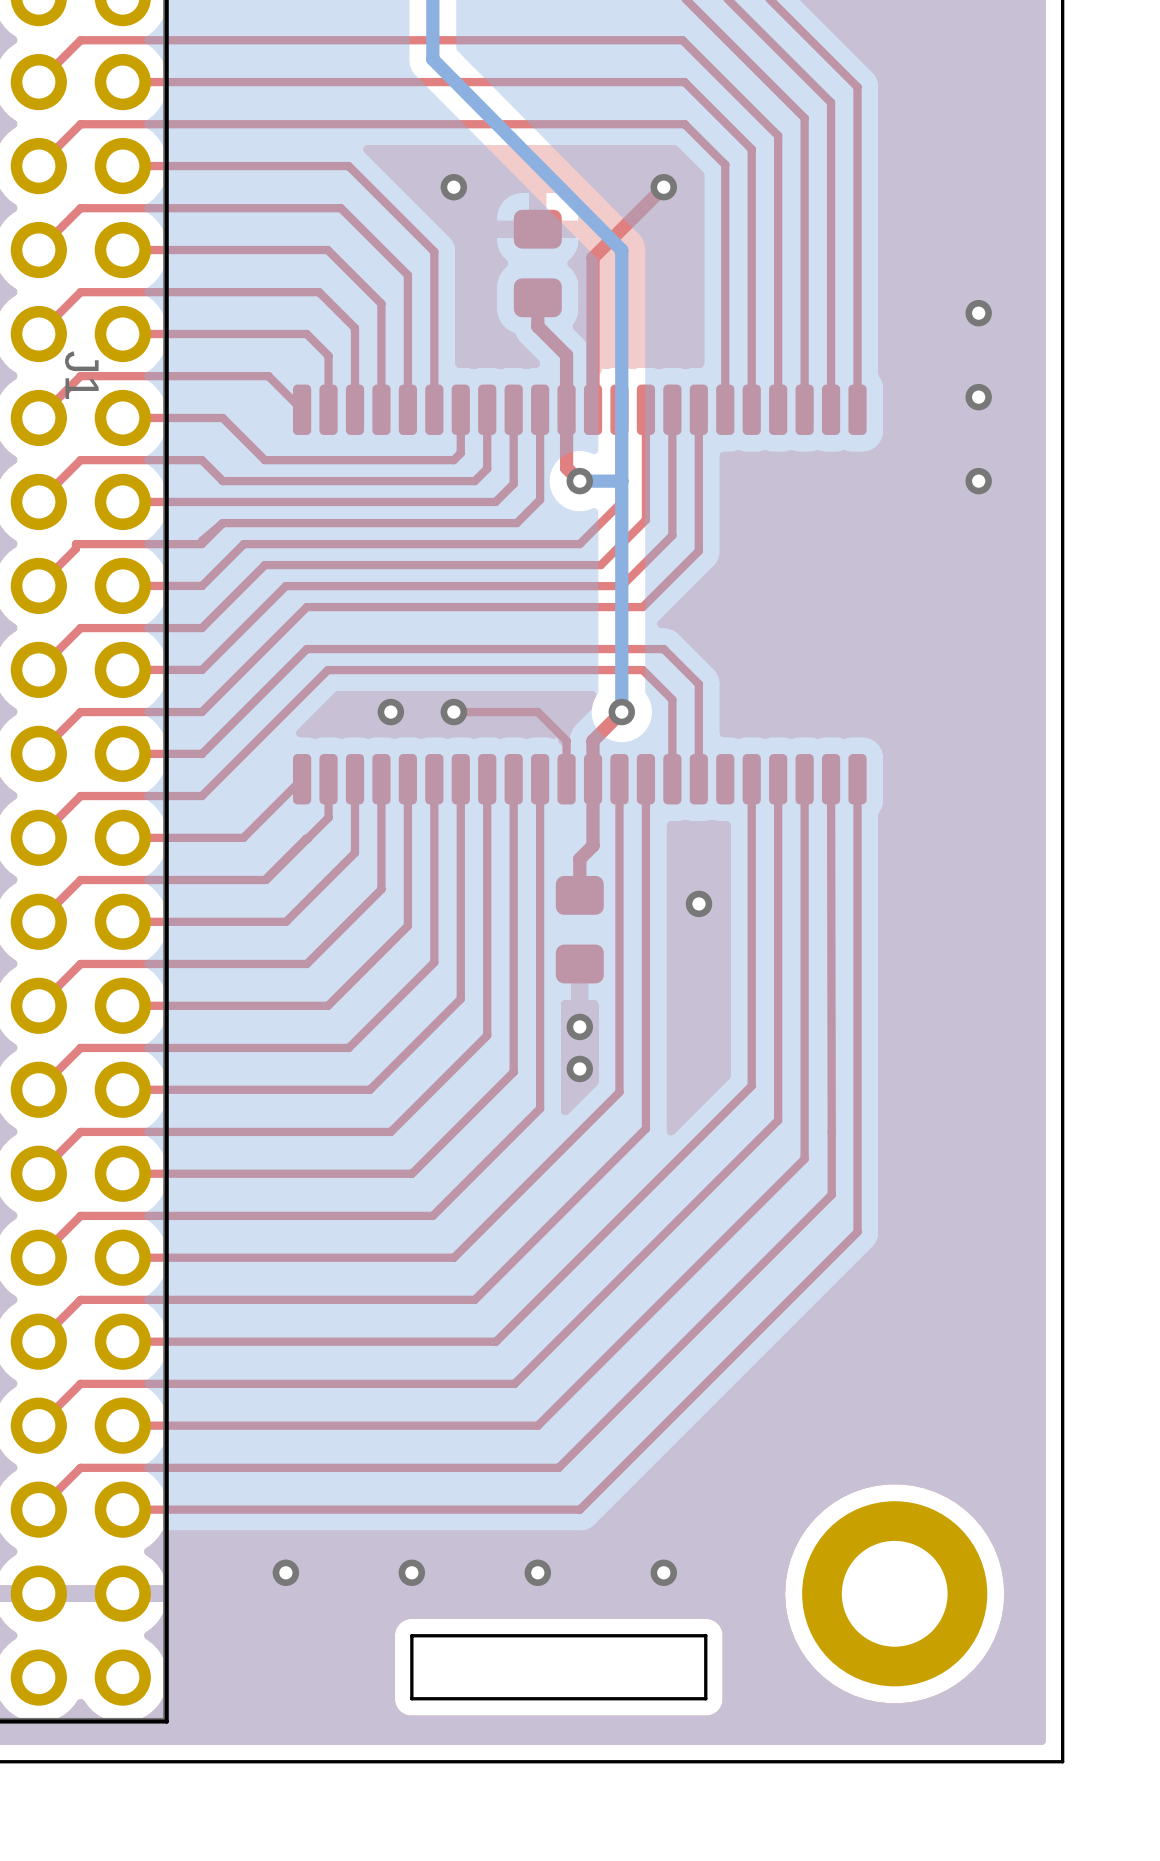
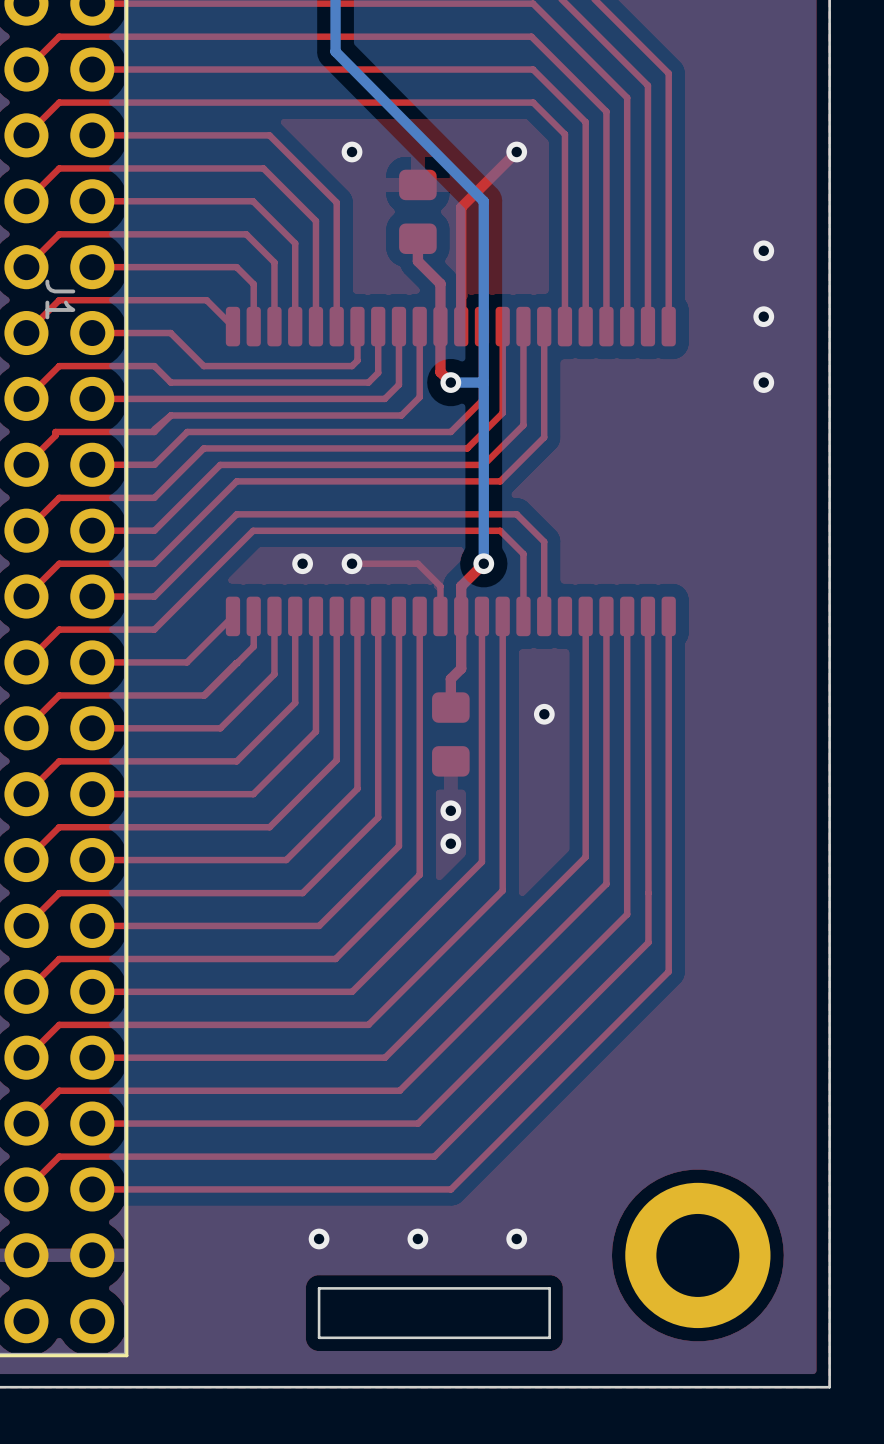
via: (285, 1572) -> none

